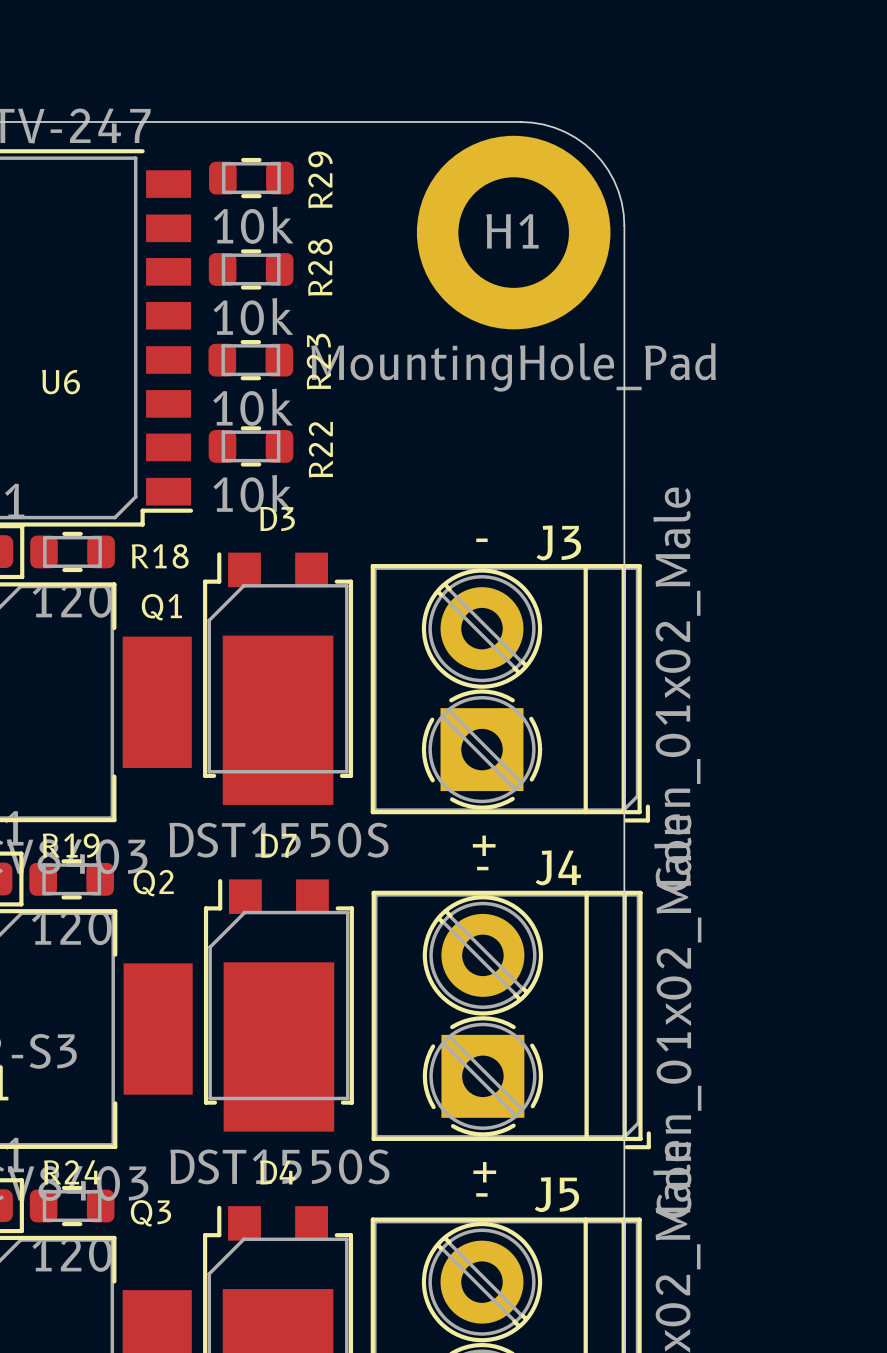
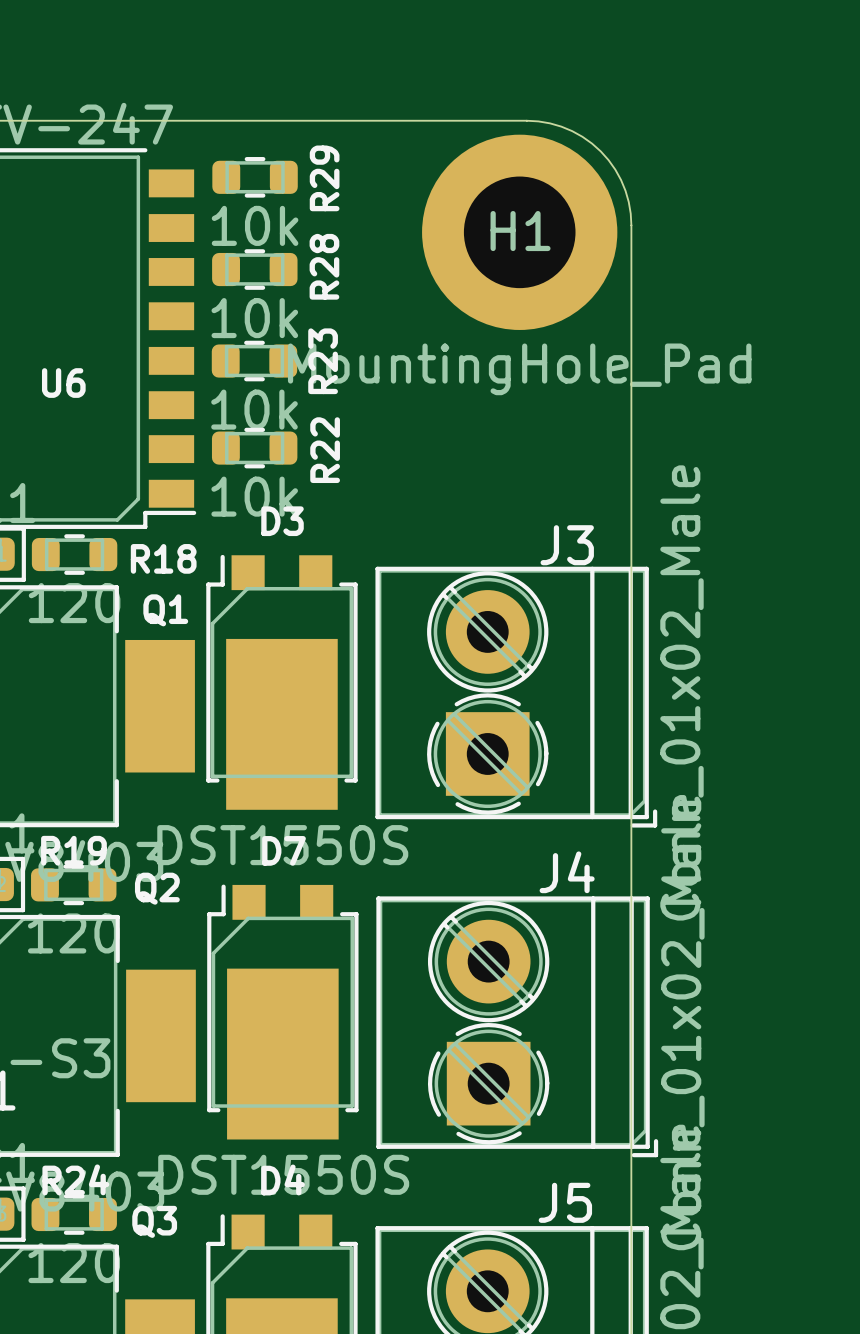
J3 text: - (481, 540) -> none
J3 text: + (484, 845) -> none
J4 text: - (482, 868) -> none
J4 text: + (484, 1172) -> none
J5 text: - (481, 1194) -> none

